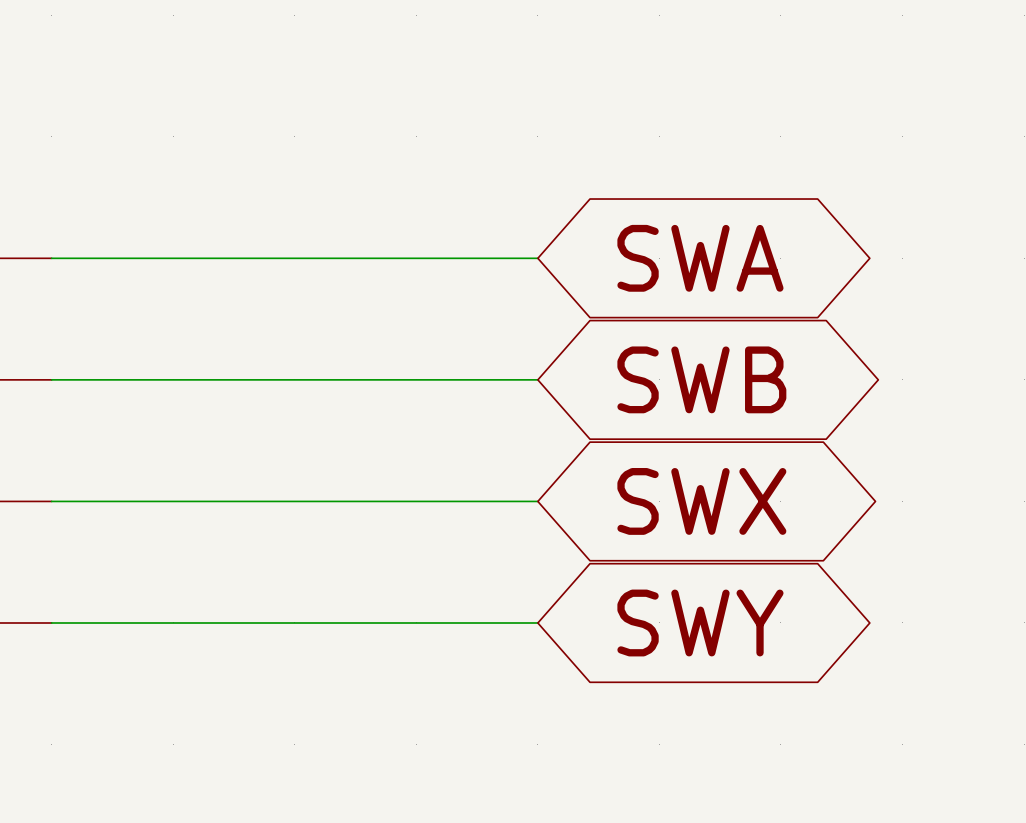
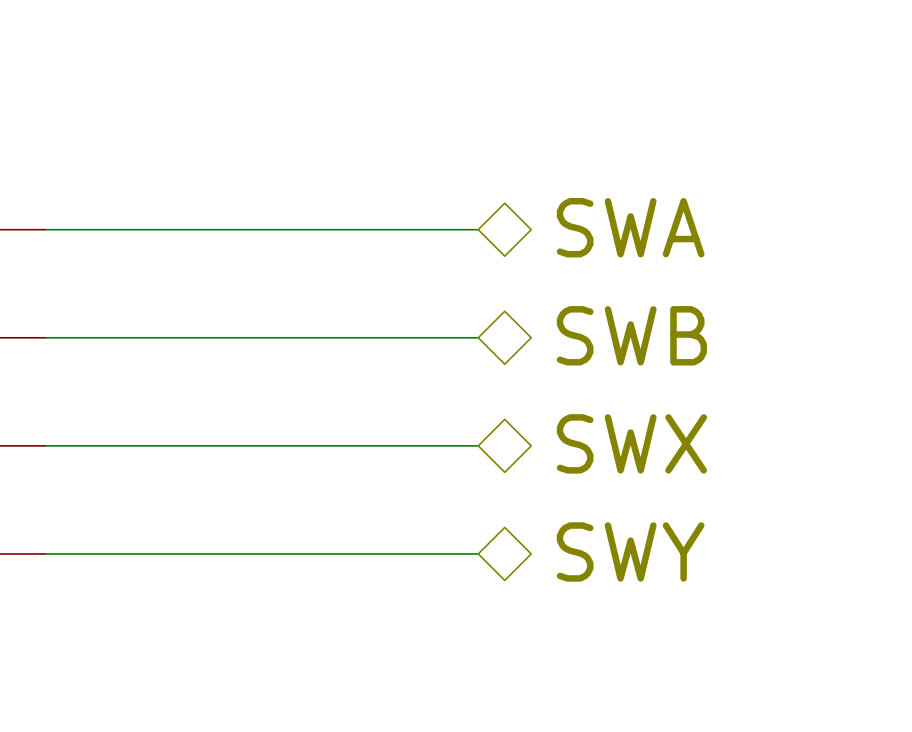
hierarchical label: none -> SWA (630, 227)
global label: SWA (700, 258) -> none
hierarchical label: none -> SWB (631, 335)
global label: SWB (701, 379) -> none
hierarchical label: none -> SWX (631, 443)
global label: SWX (701, 501) -> none
hierarchical label: none -> SWY (630, 551)
global label: SWY (700, 622) -> none

